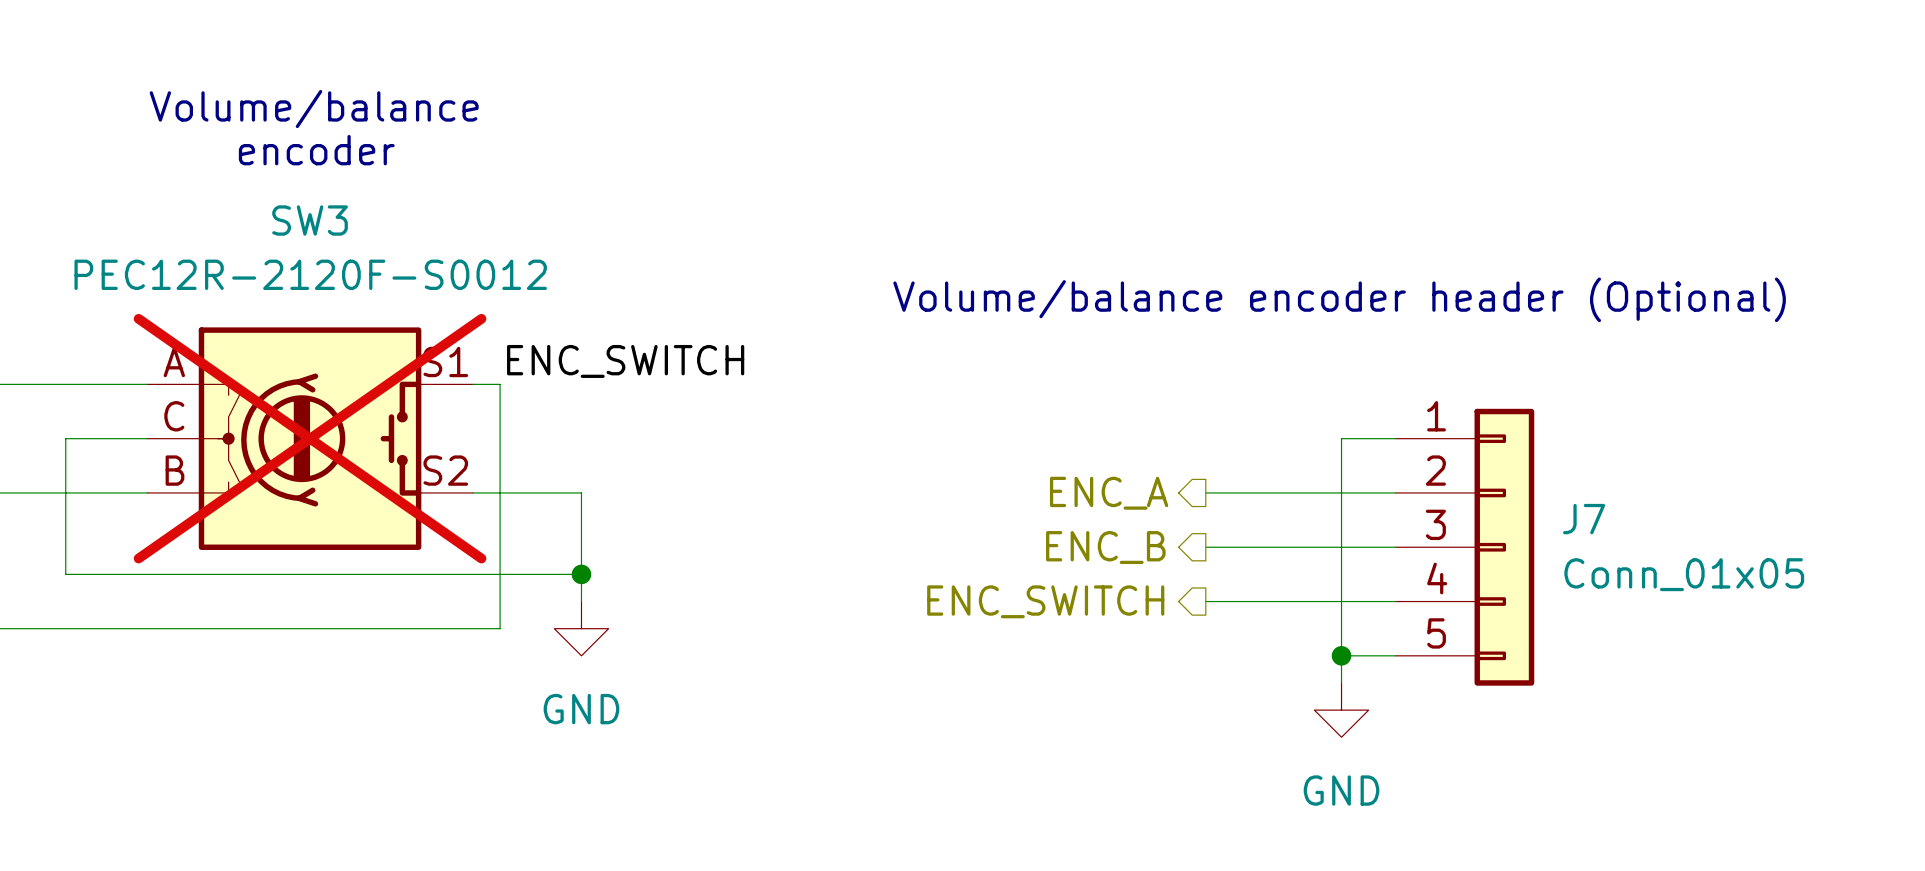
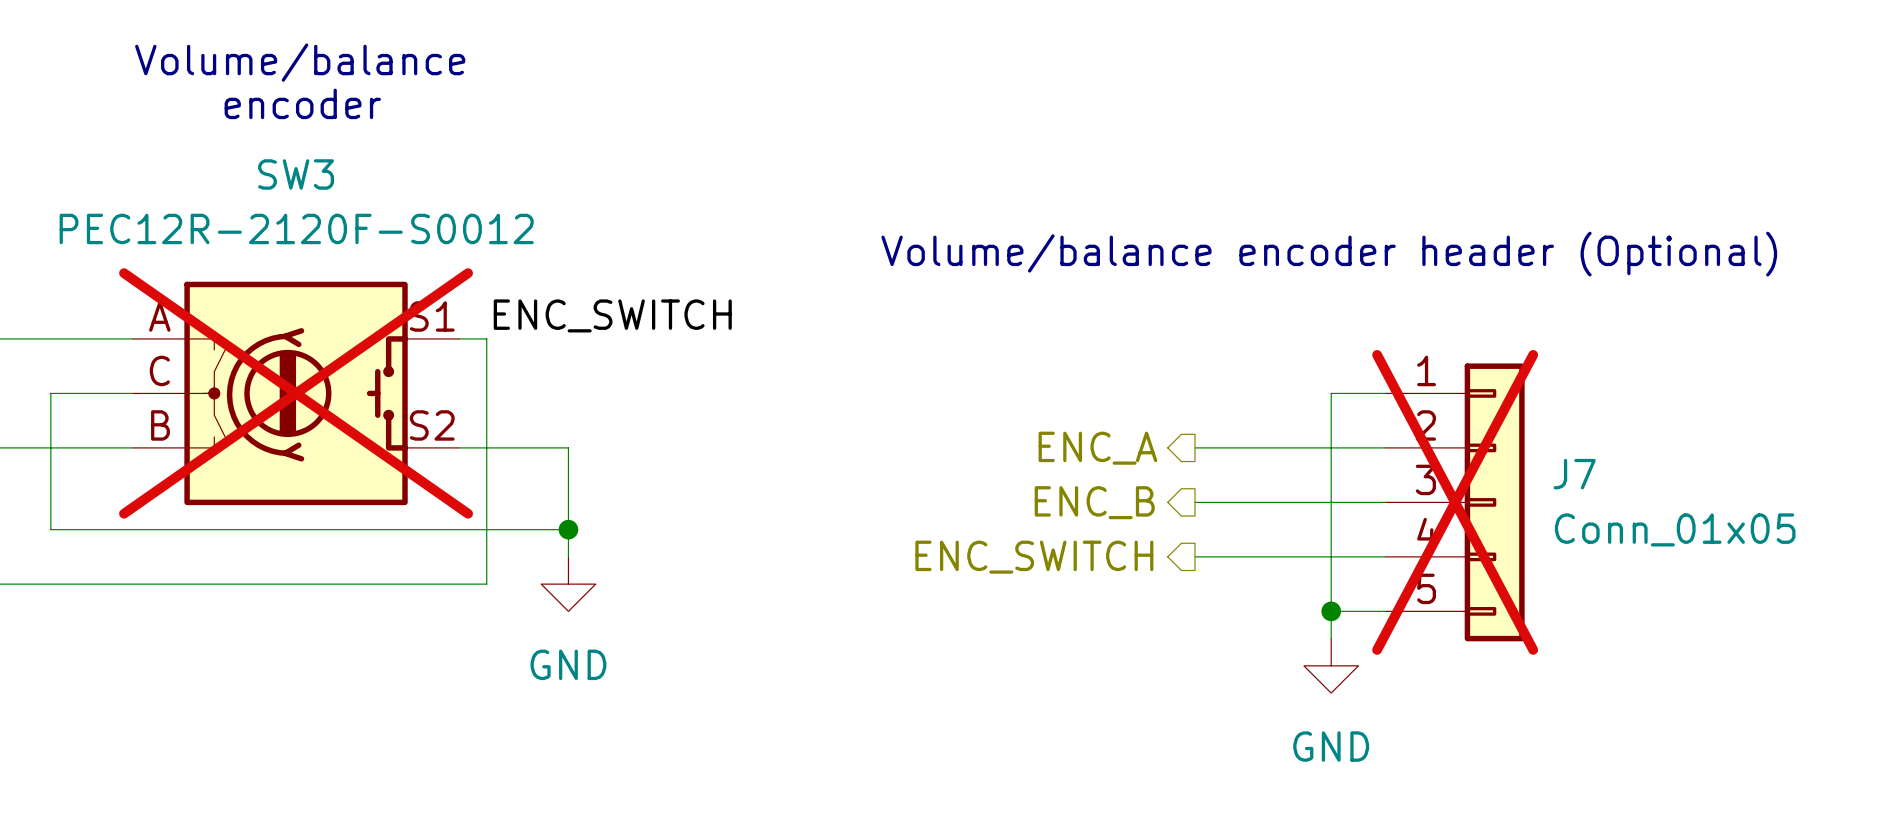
J7 do-not-place cross: none -> (1455, 502)

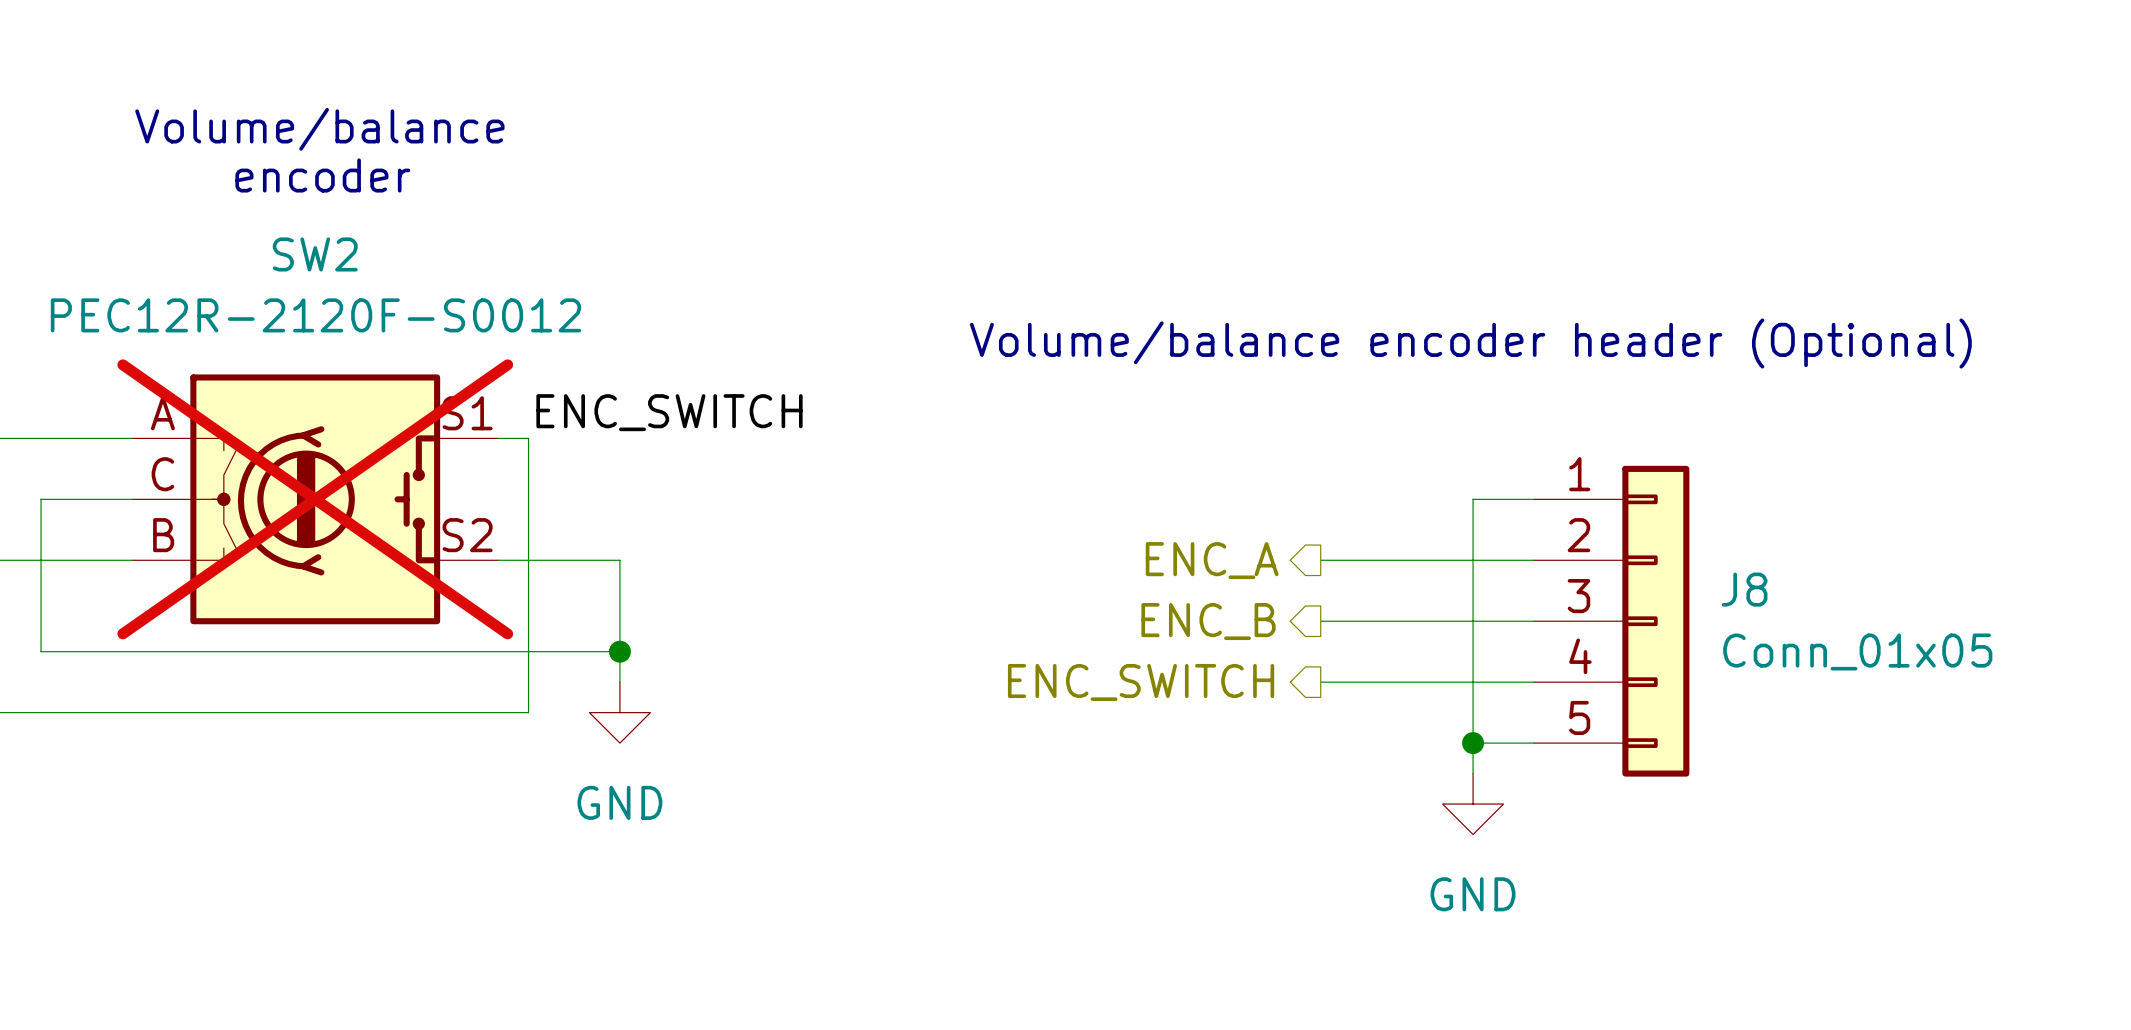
SW3 name: SW3 (296, 174) -> SW2 (315, 254)
J7 name: J7 (1574, 474) -> J8 (1744, 589)
J7 do-not-place cross: (1455, 502) -> none

